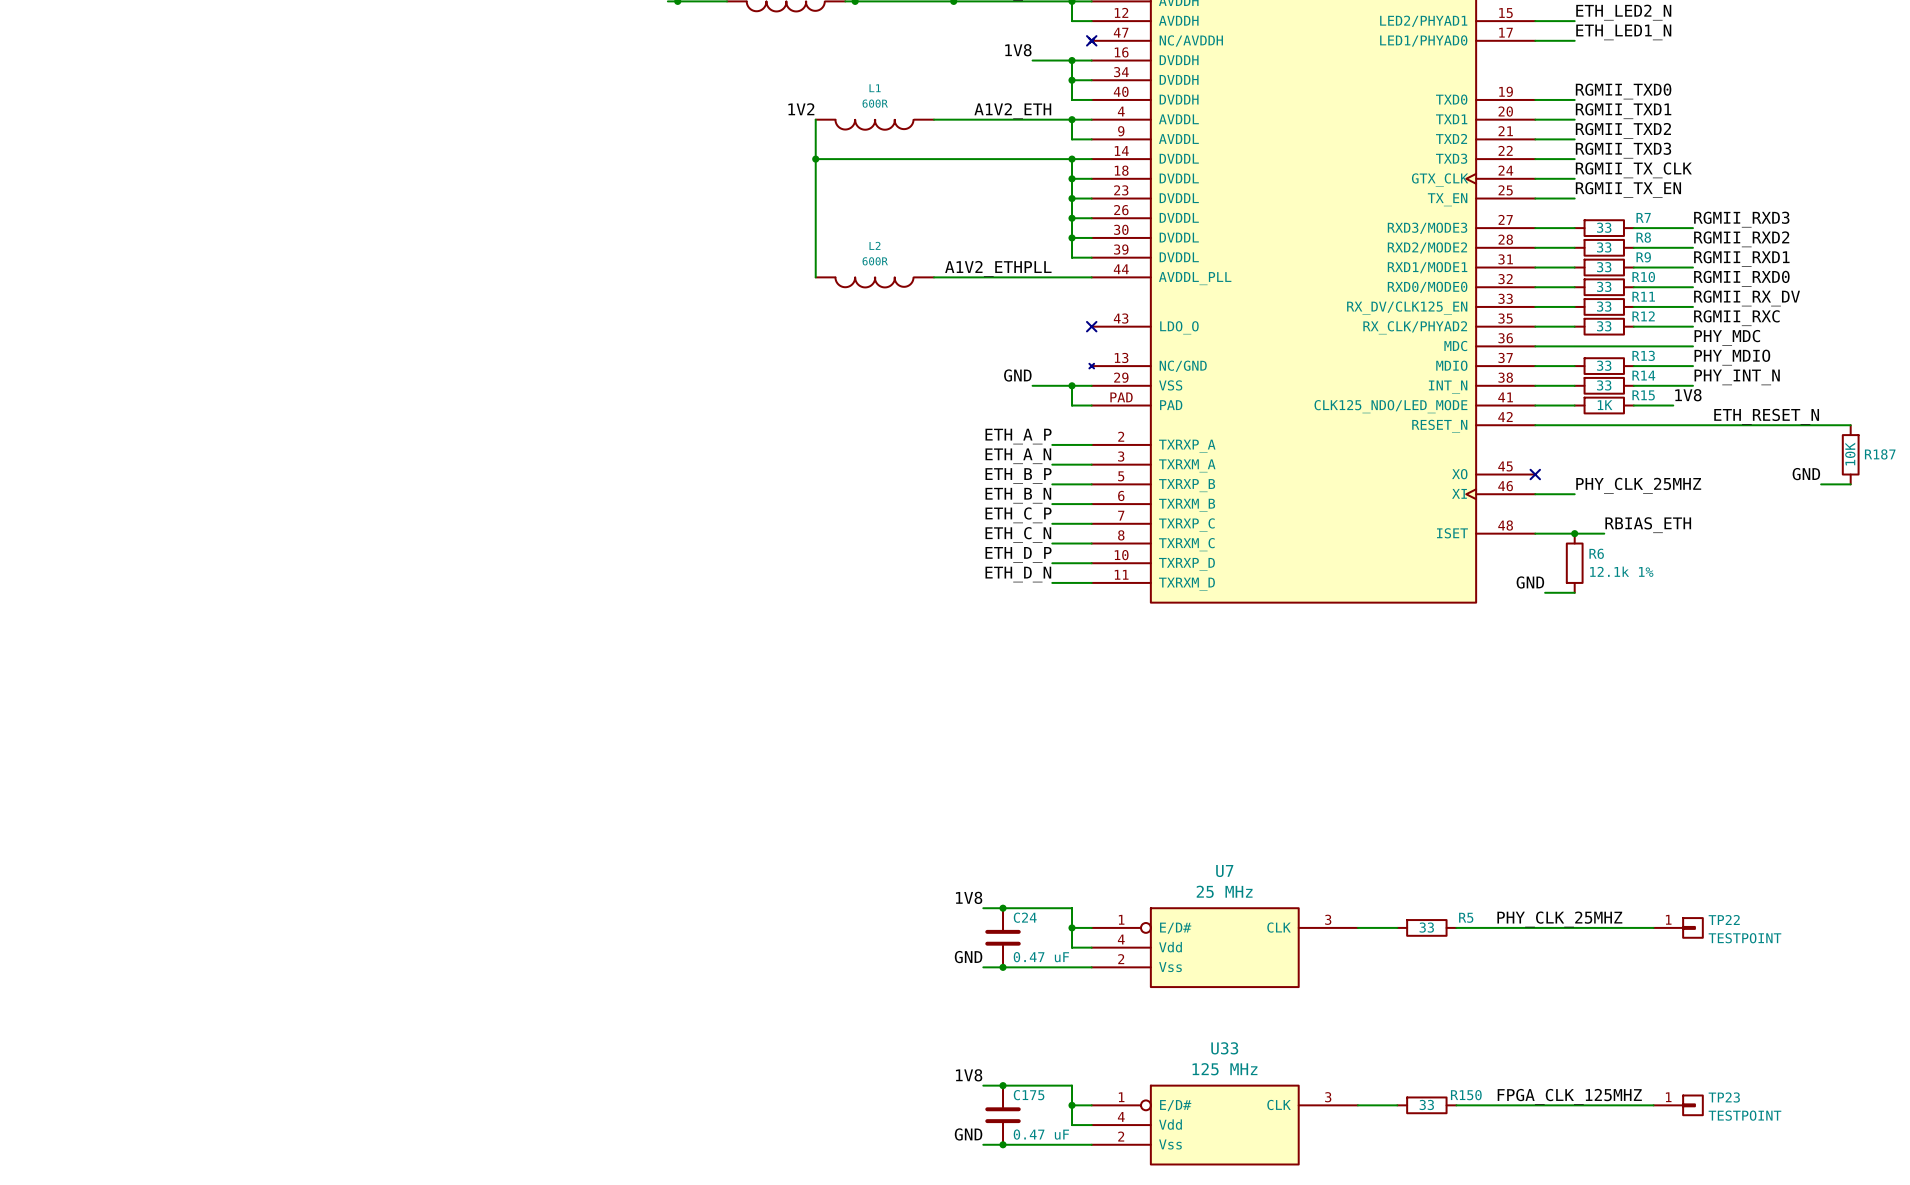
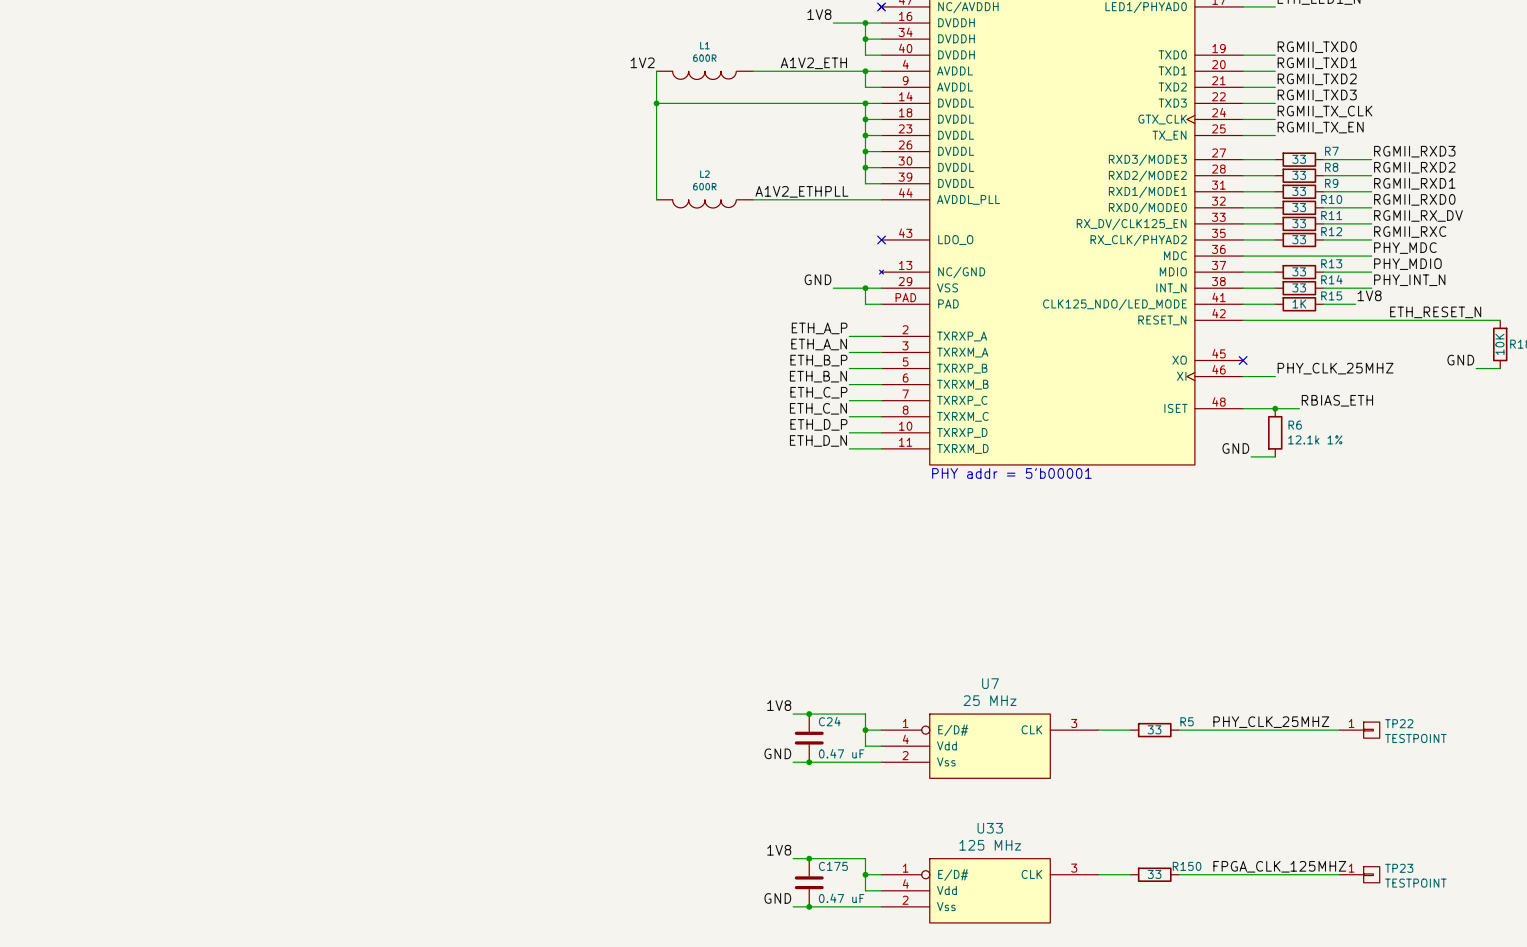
text: none -> PHY addr = 5'b00001 (1011, 473)

